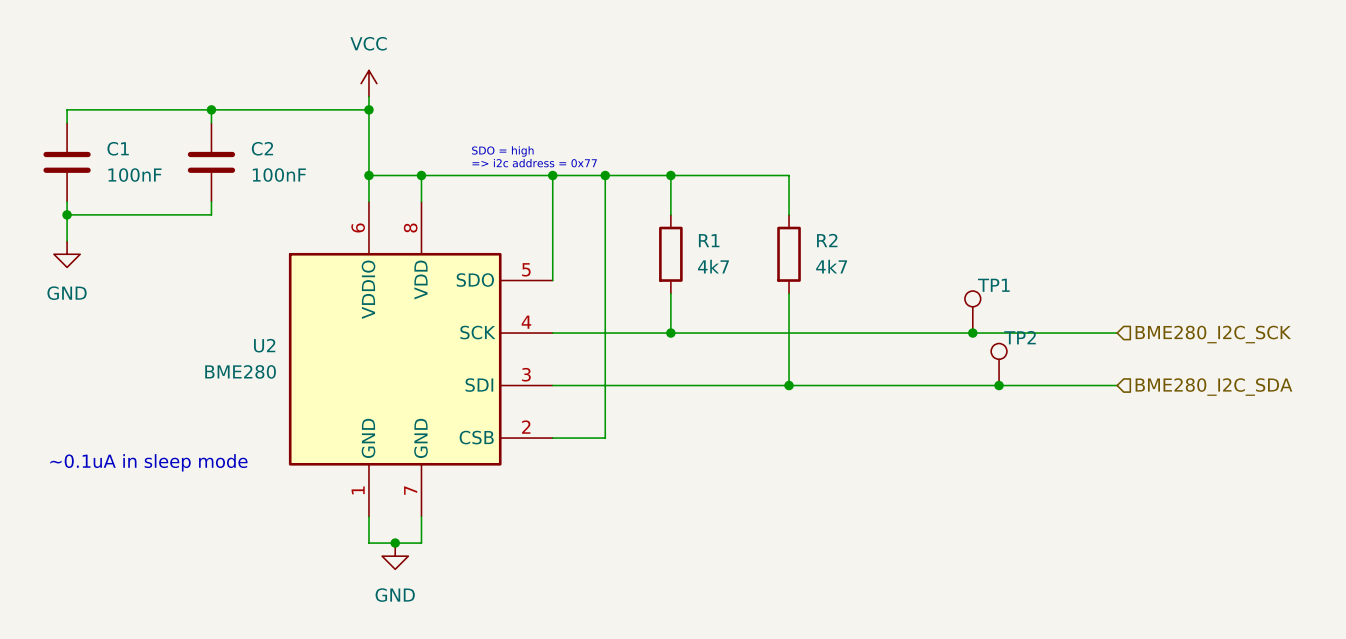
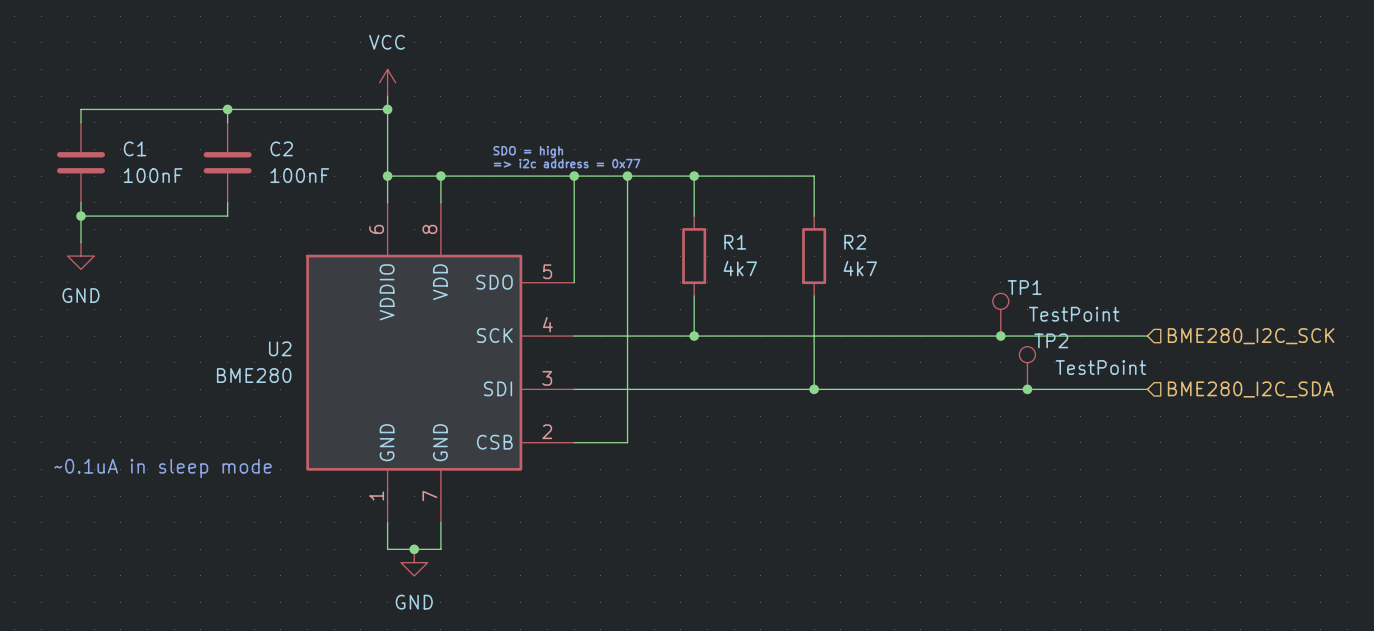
TP1 value: none -> TestPoint (1074, 314)
TP2 value: none -> TestPoint (1100, 367)

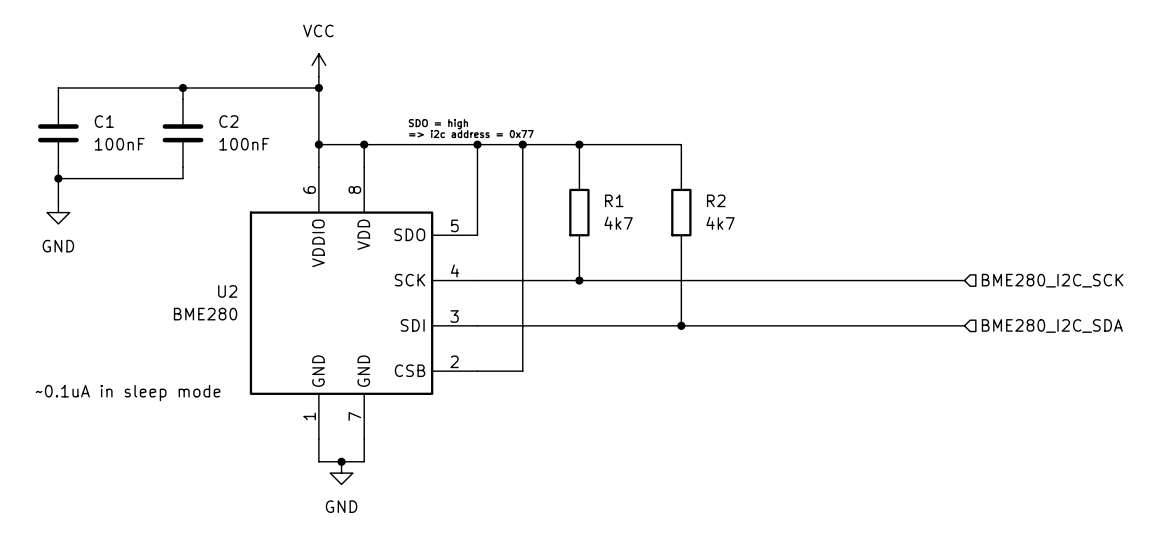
TP1: TestPoint (1000, 314) -> none
junction: (1000, 336) -> none
TP2: TestPoint (1027, 368) -> none
junction: (1027, 389) -> none

